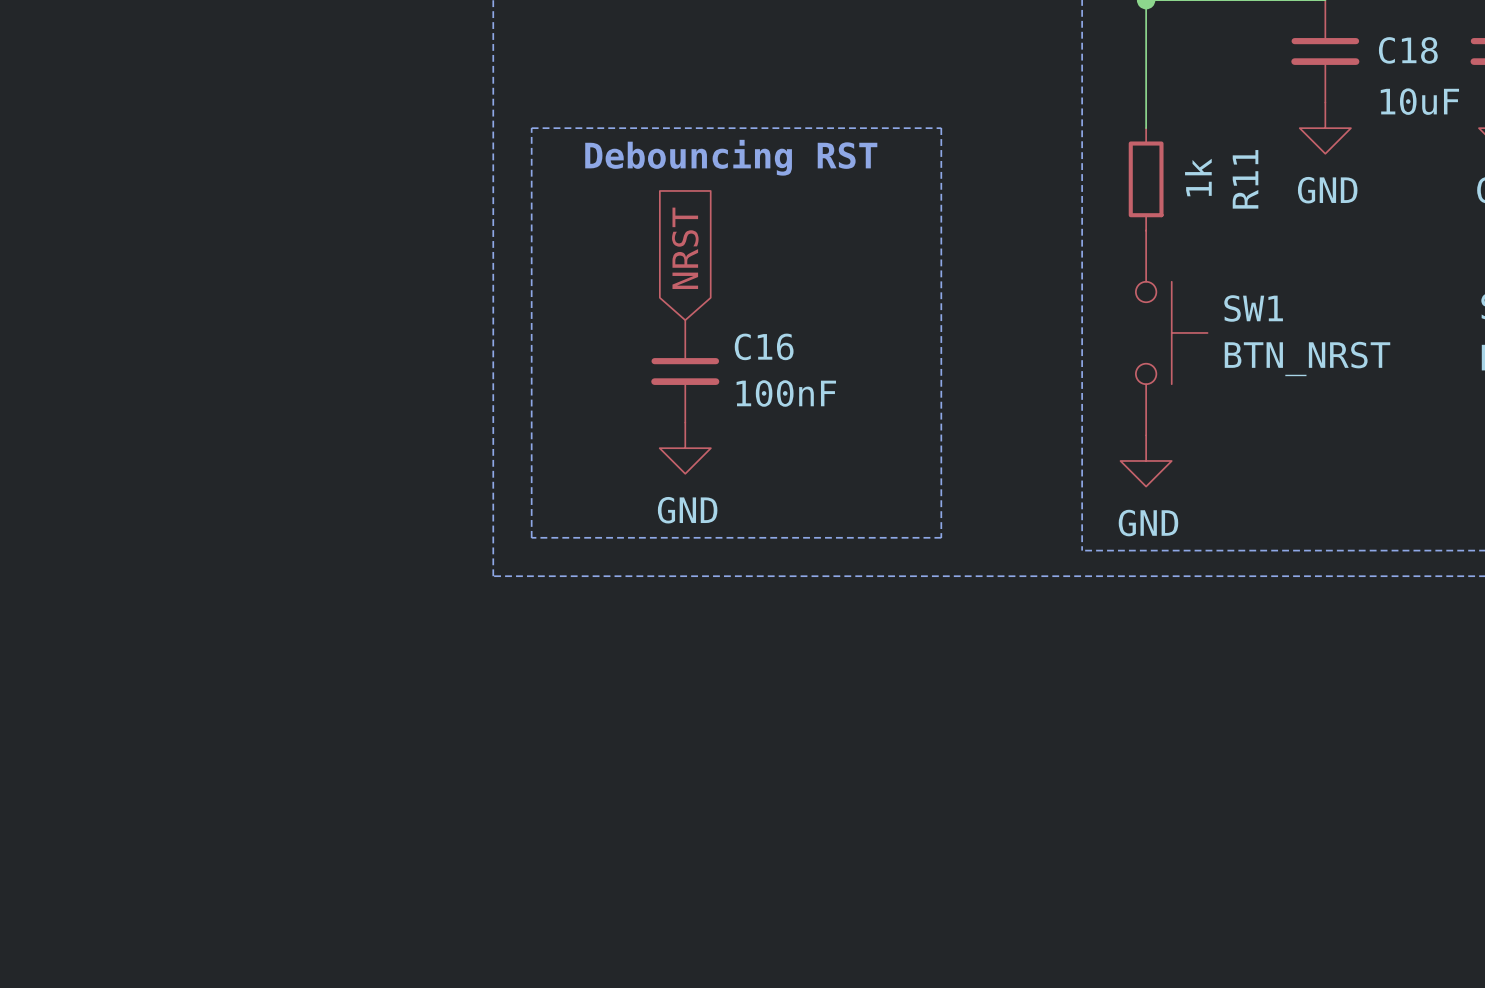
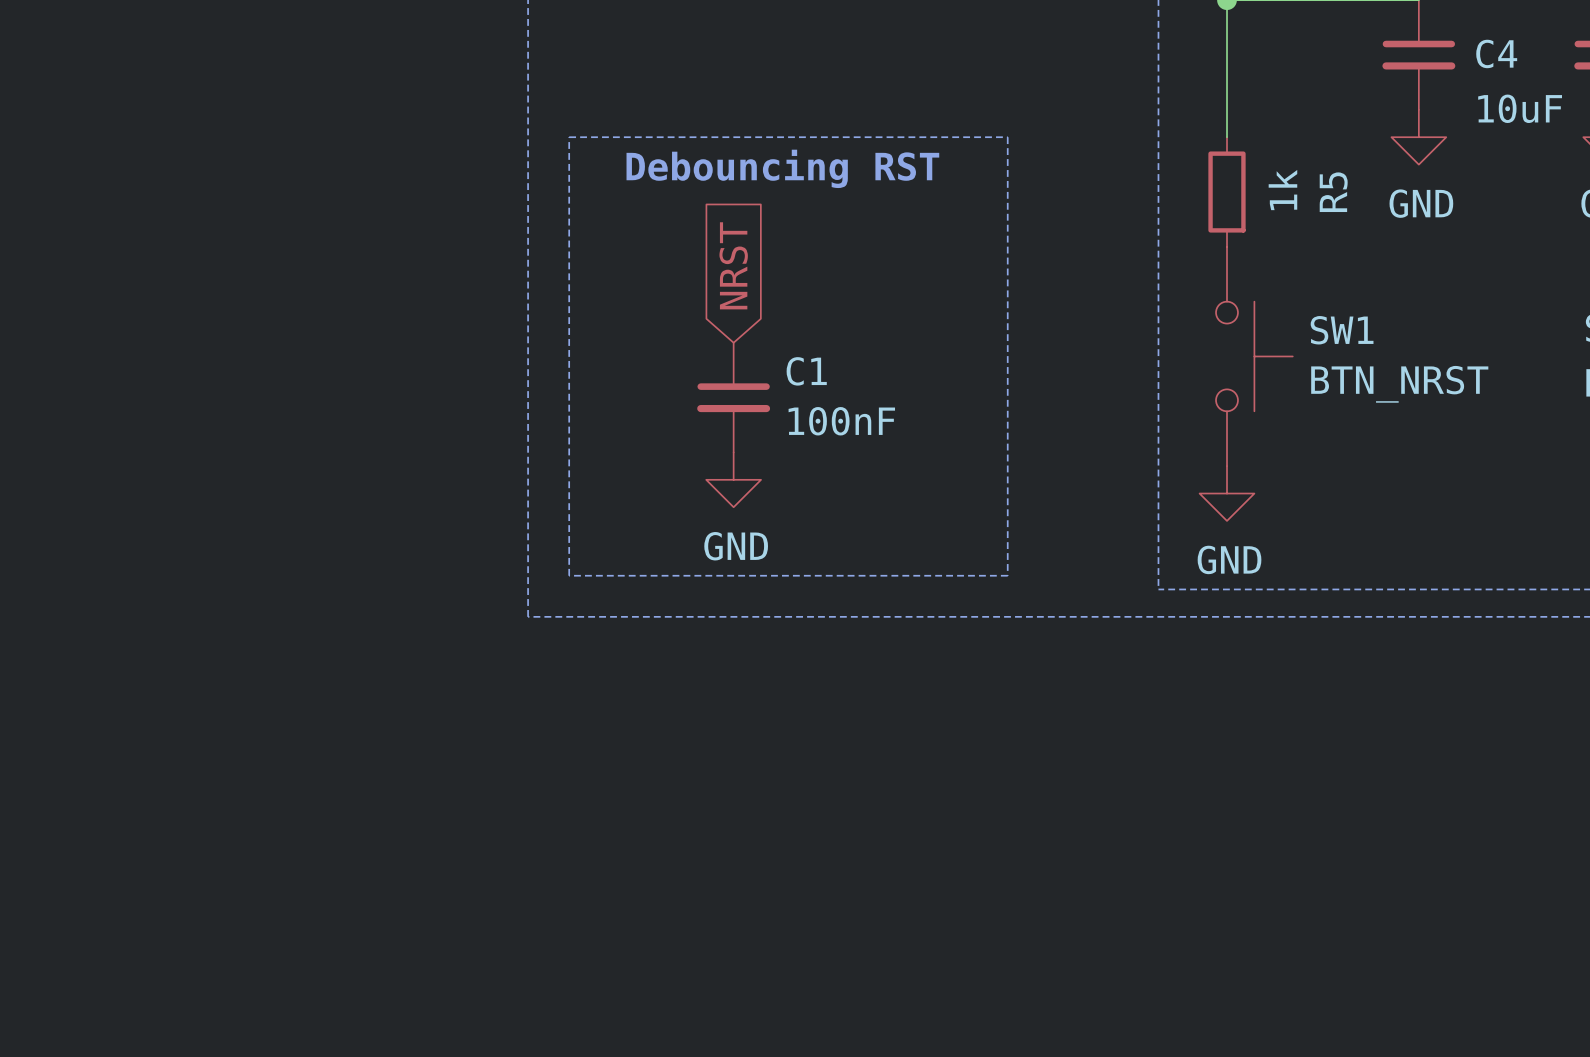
C18 name: C18 (1408, 50) -> C4 (1496, 53)
R11 name: R11 (1245, 179) -> R5 (1333, 192)
C16 name: C16 (764, 346) -> C1 (806, 371)

